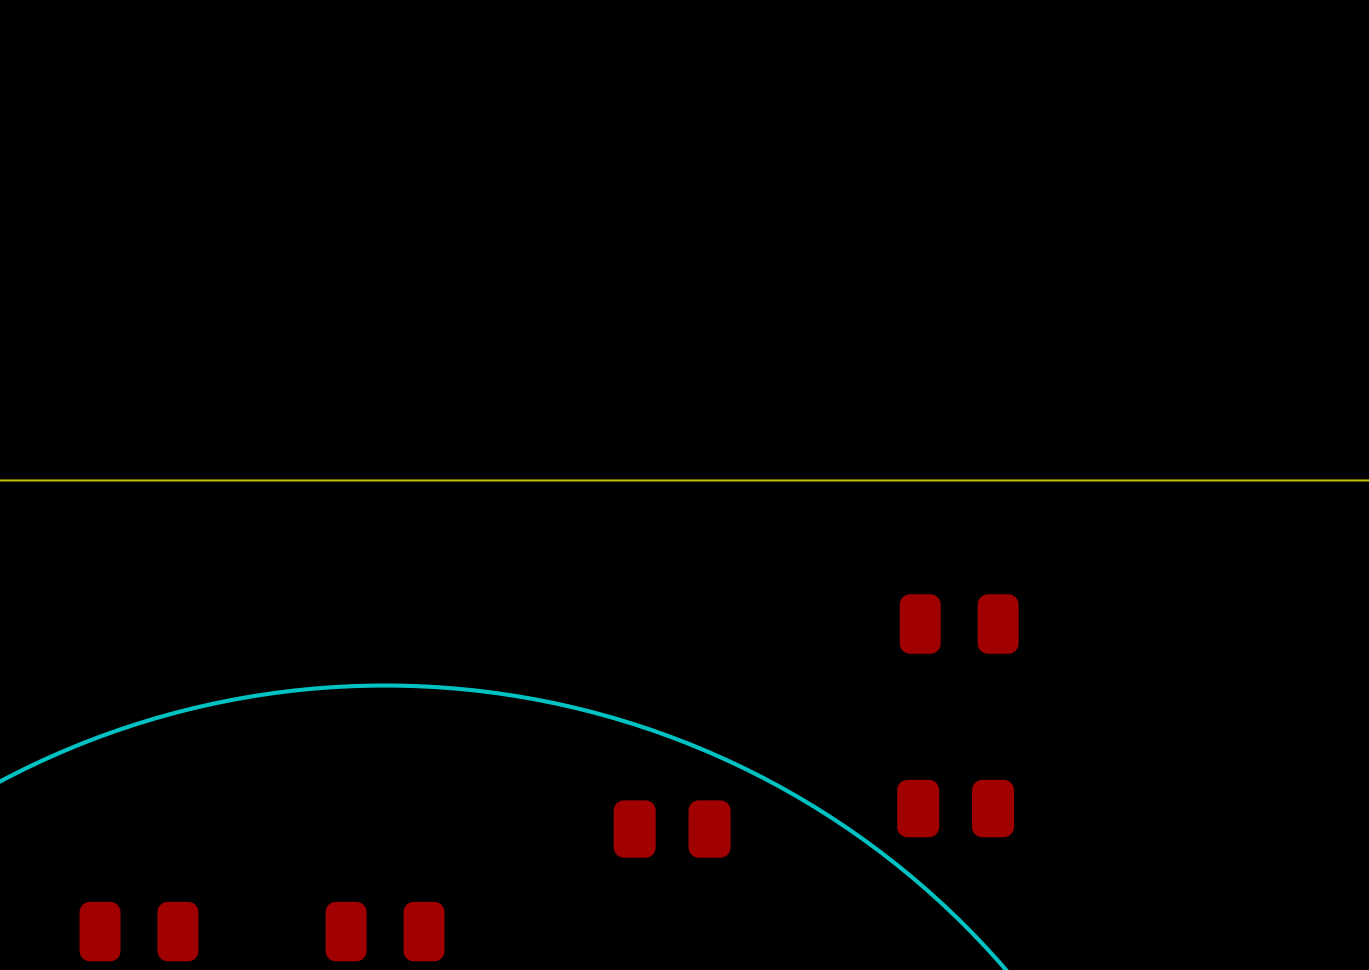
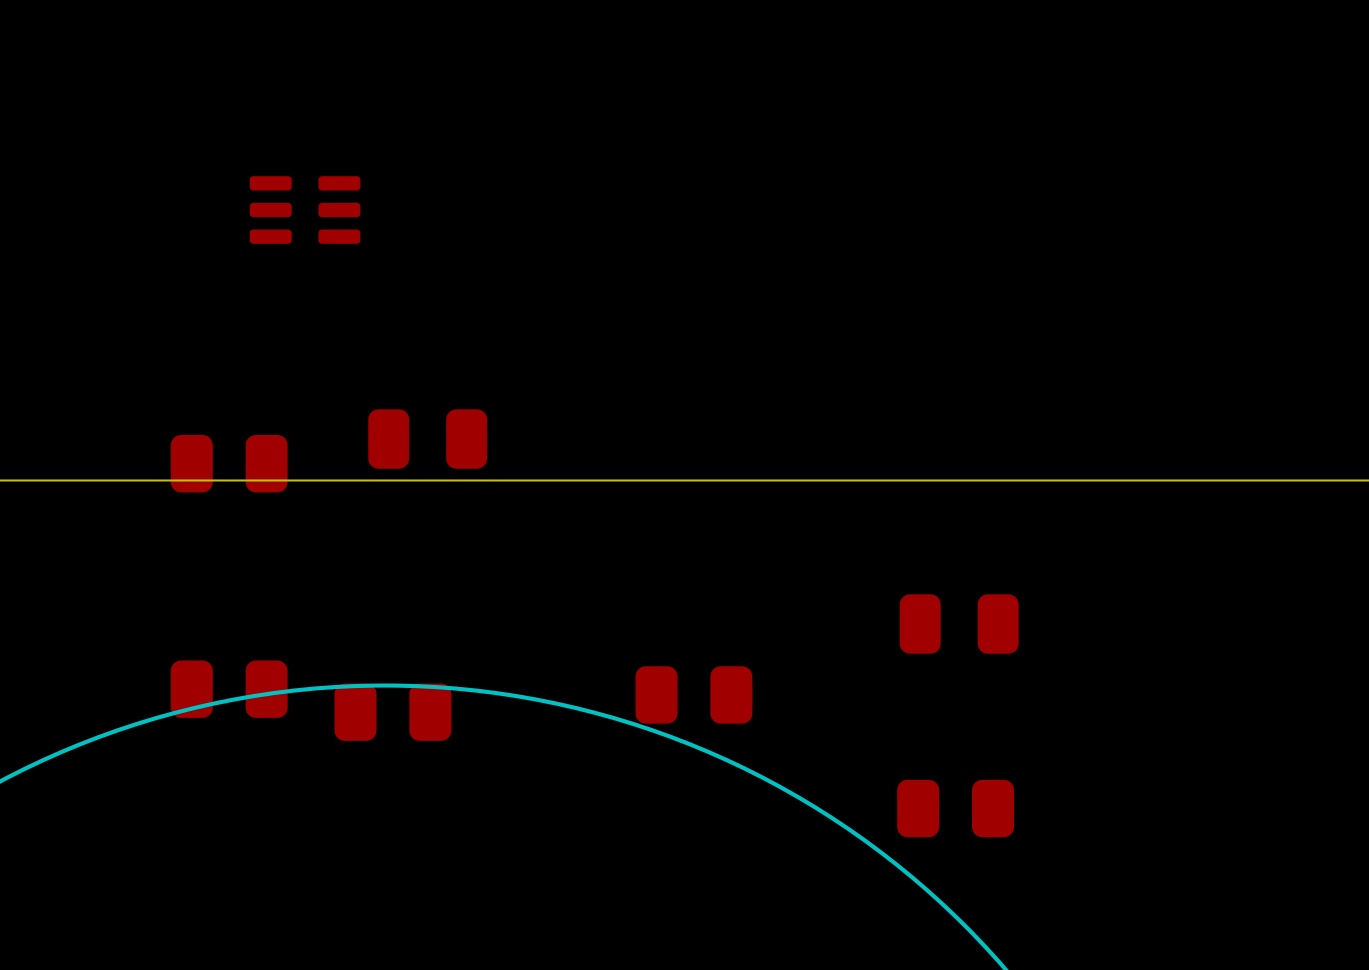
part: none -> (305, 210)
part: none -> (427, 439)
part: none -> (229, 463)
part: none -> (229, 689)
part: none -> (392, 712)
part position: (672, 829) -> (693, 694)
part: (138, 931) -> none
part: (385, 931) -> none

